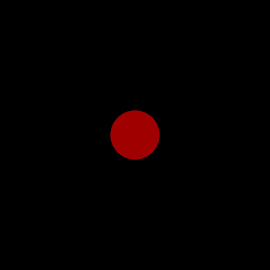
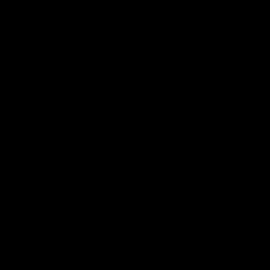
part: (135, 135) -> none

